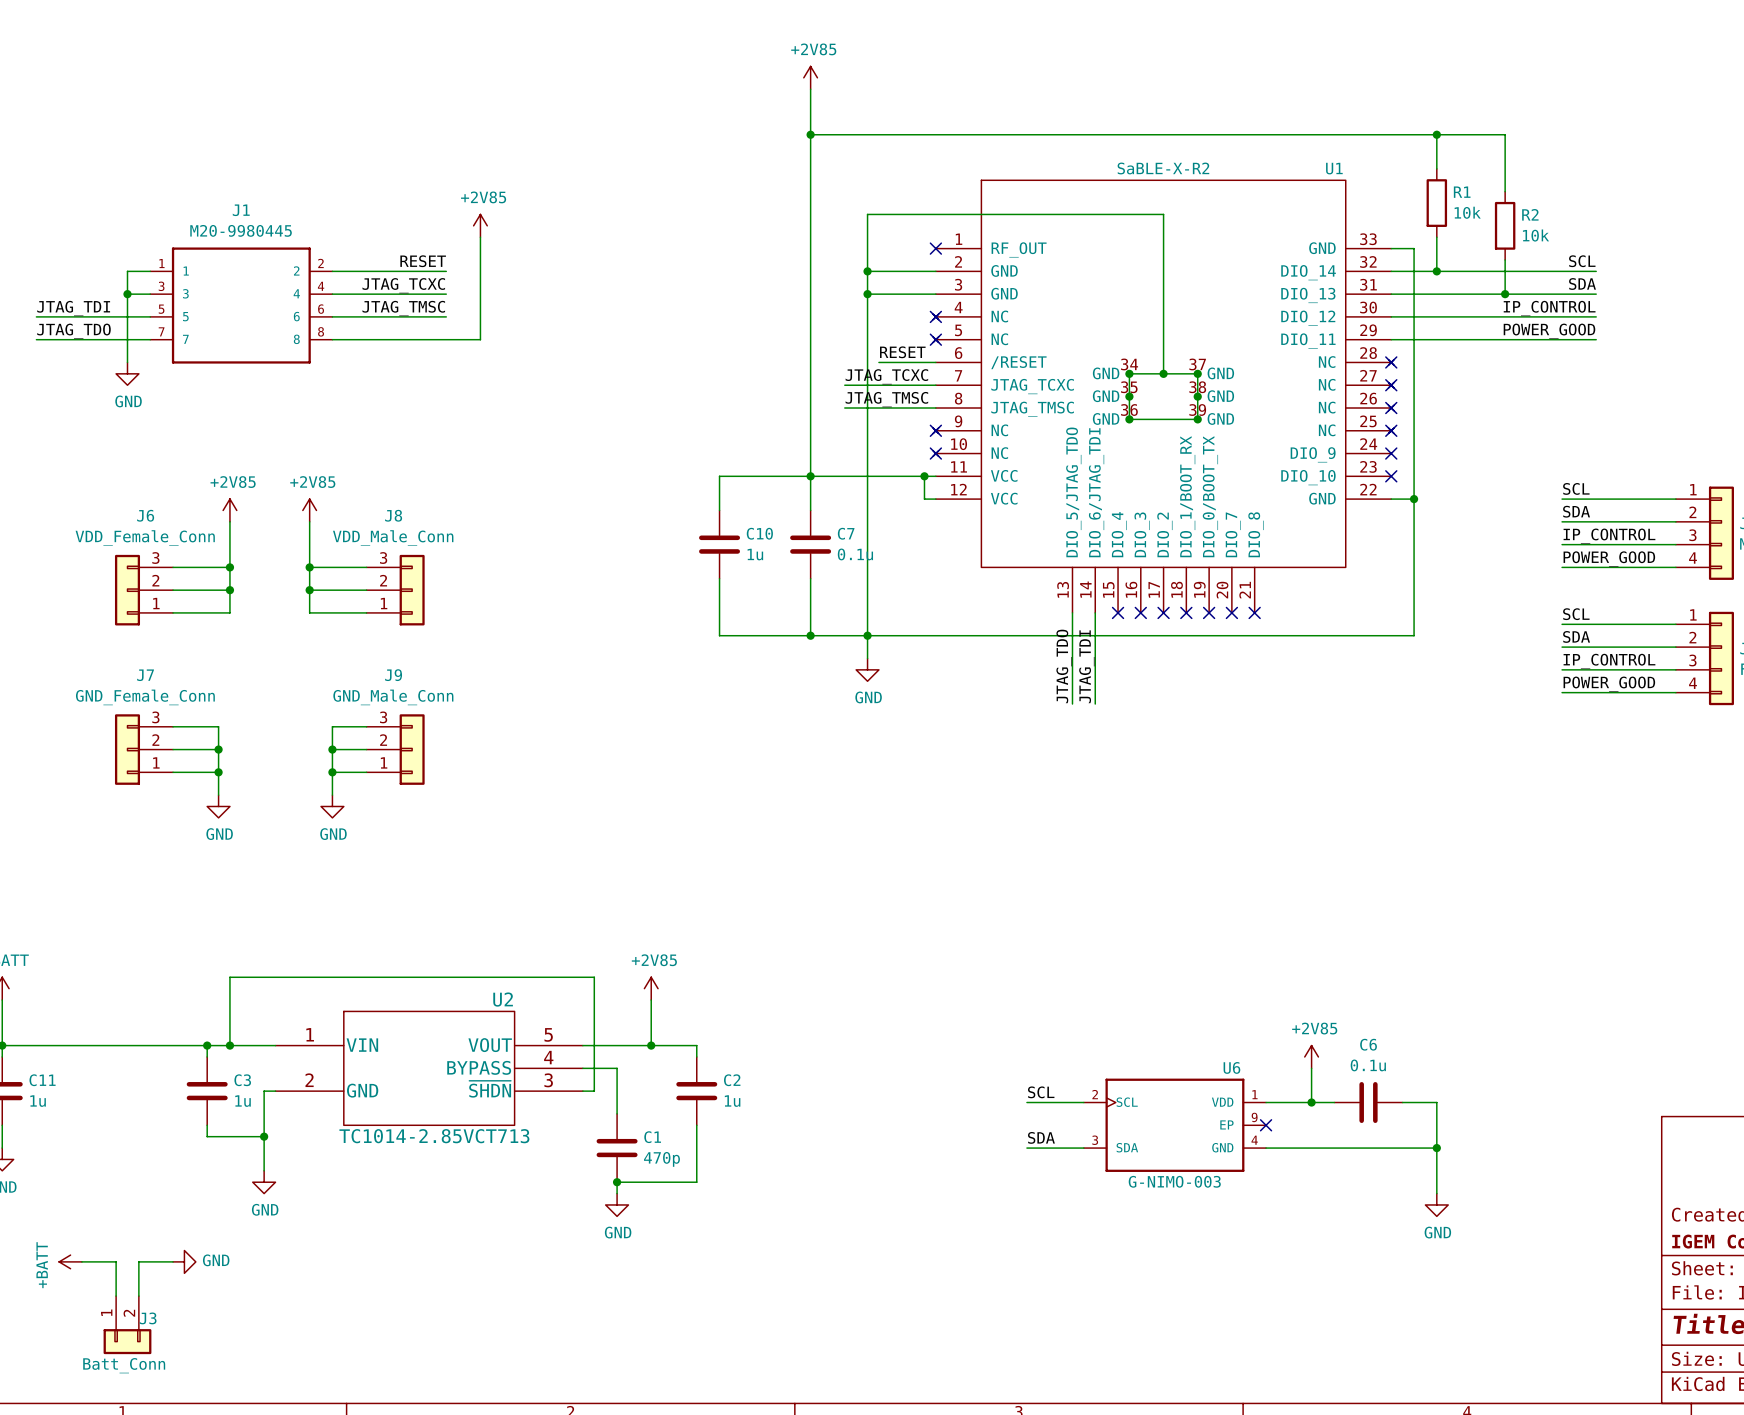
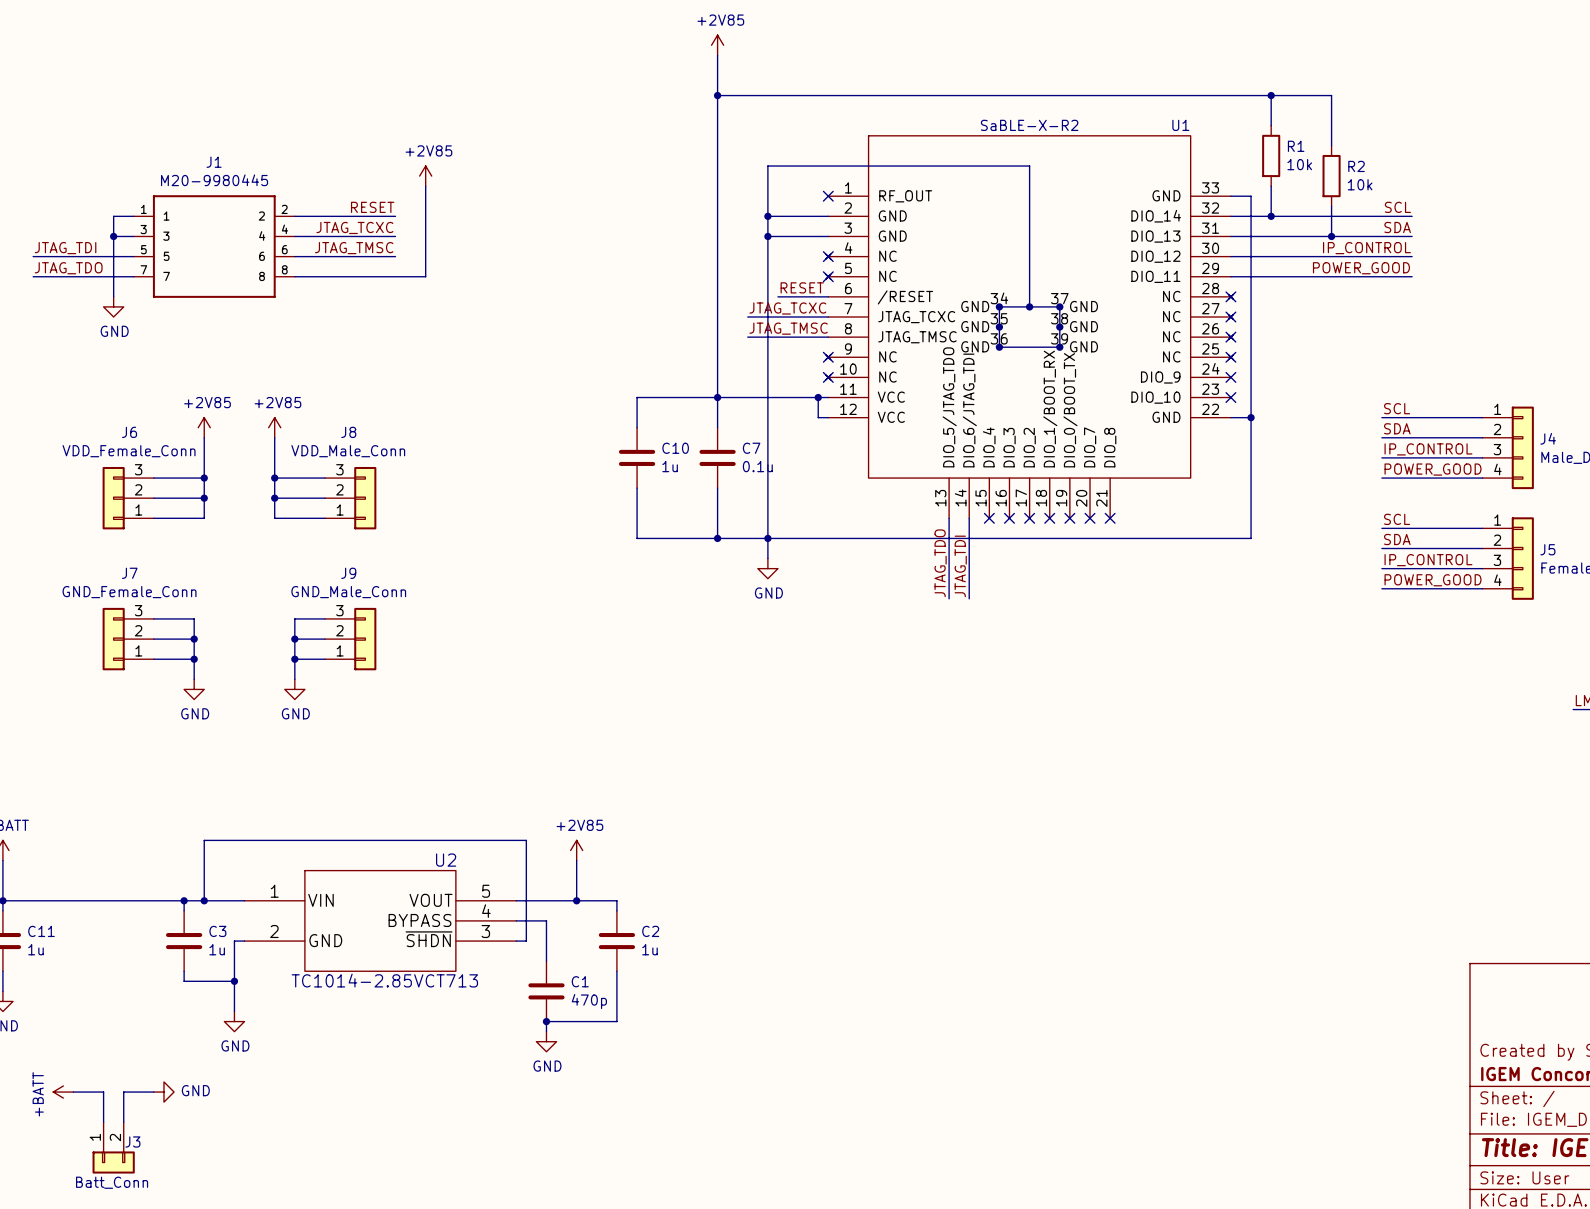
power symbol: +2V85 (1311, 1056) -> none
wire: (1311, 1068) (1311, 1102) -> none
label: SCL (1041, 1092) -> none
wire: (1026, 1102) (1083, 1102) -> none
wire: (1266, 1102) (1334, 1102) -> none
junction: (1311, 1102) -> none
C6: 0.1u (1368, 1102) -> none
wire: (1402, 1102) (1436, 1102) (1436, 1193) -> none
U6: G-NIMO-003 (1174, 1125) -> none
no-connect mark: (1266, 1125) -> none
label: SDA (1041, 1137) -> none
wire: (1026, 1148) (1083, 1148) -> none
wire: (1266, 1148) (1436, 1148) -> none
junction: (1436, 1148) -> none
power symbol: GND (1436, 1204) -> none

